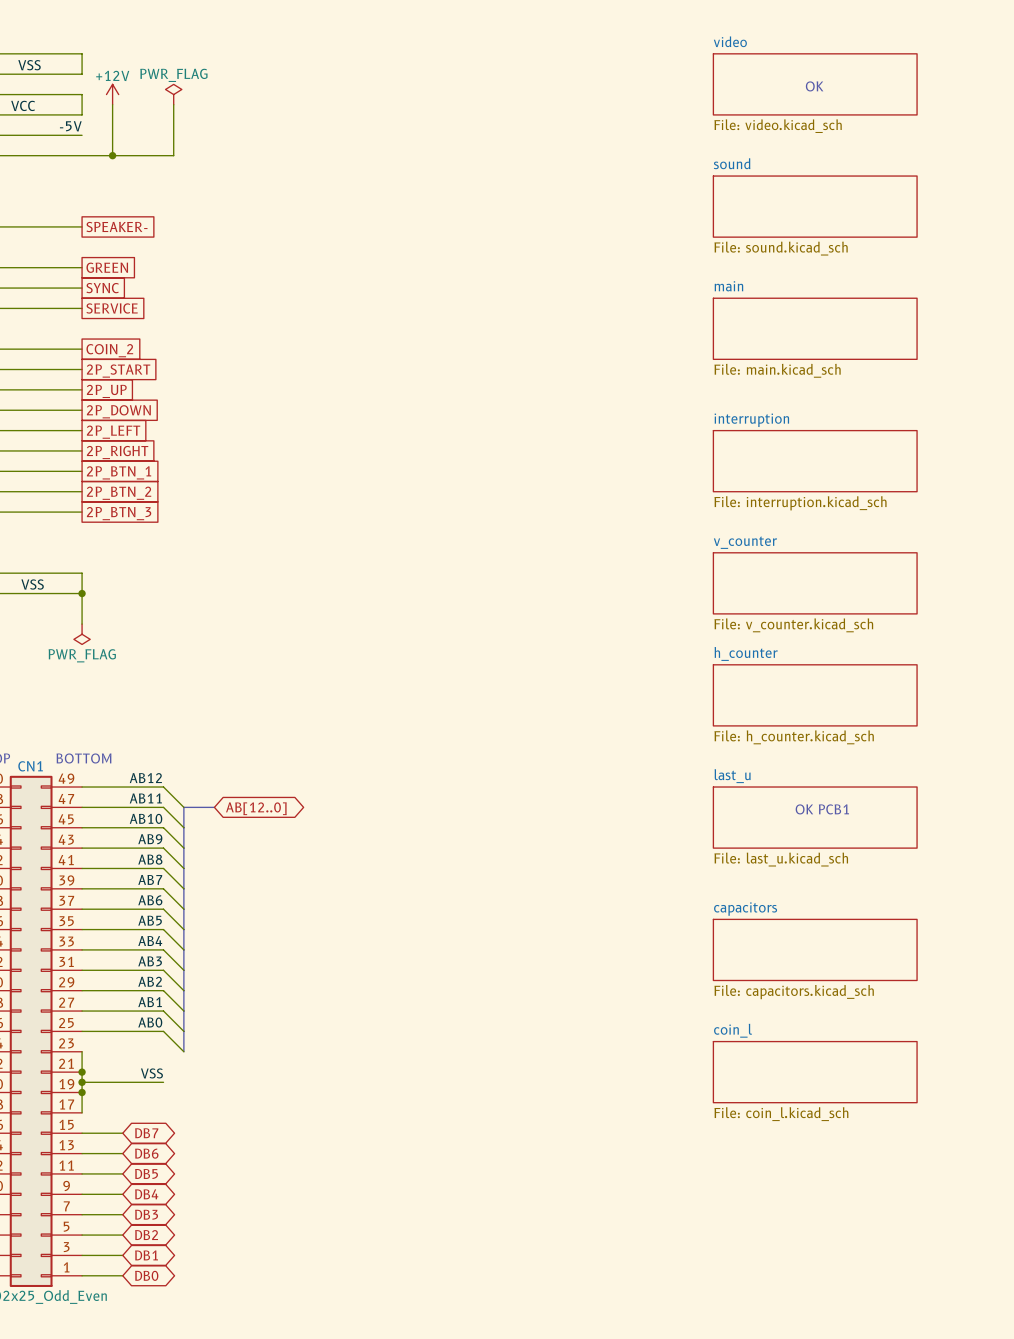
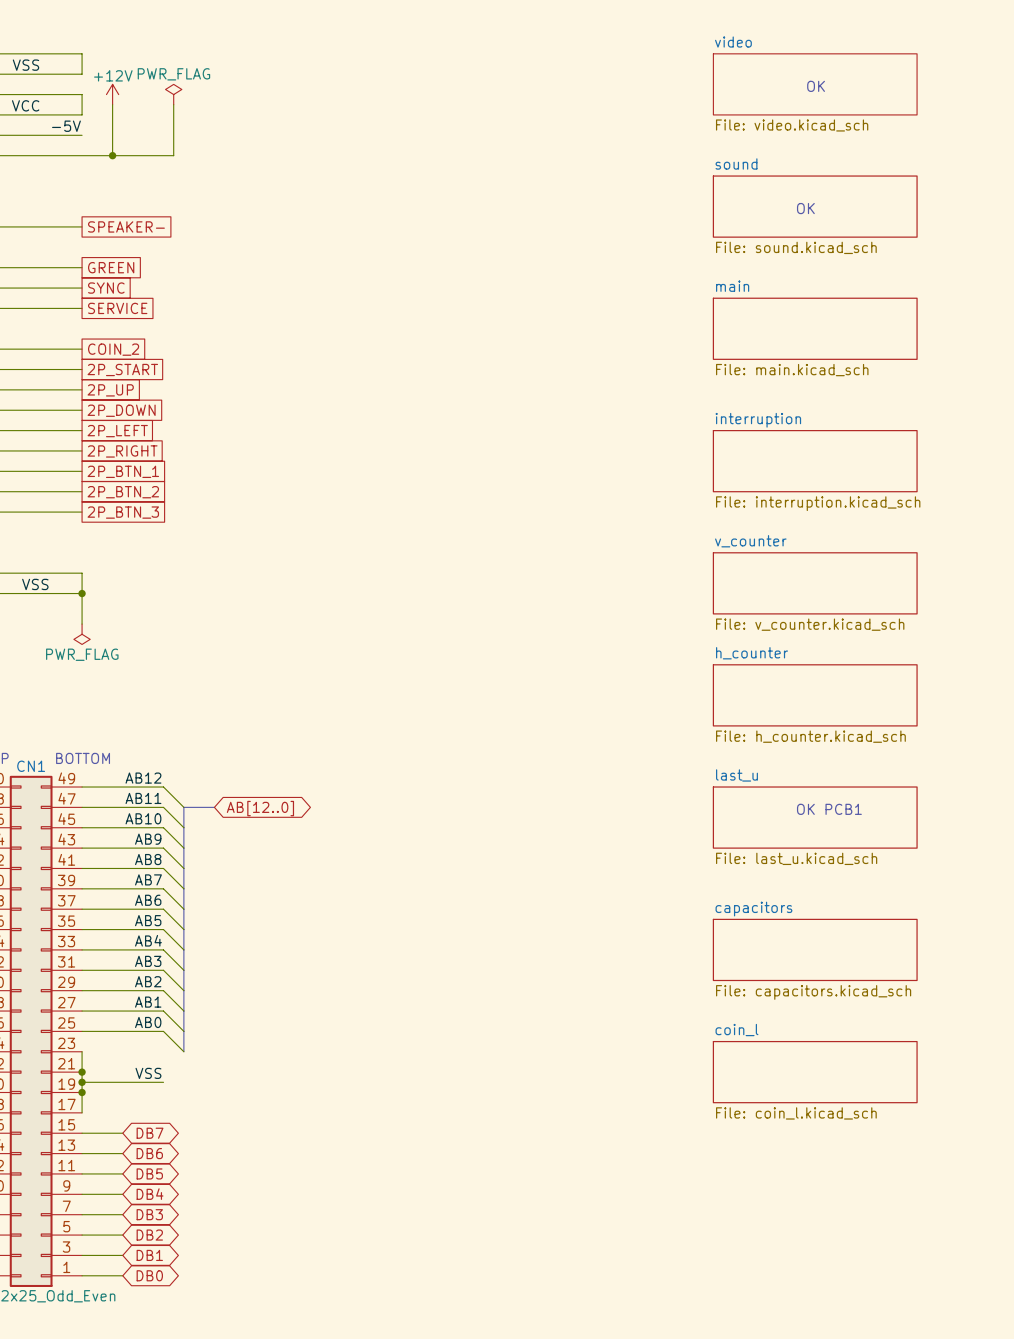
text: none -> OK (805, 208)

